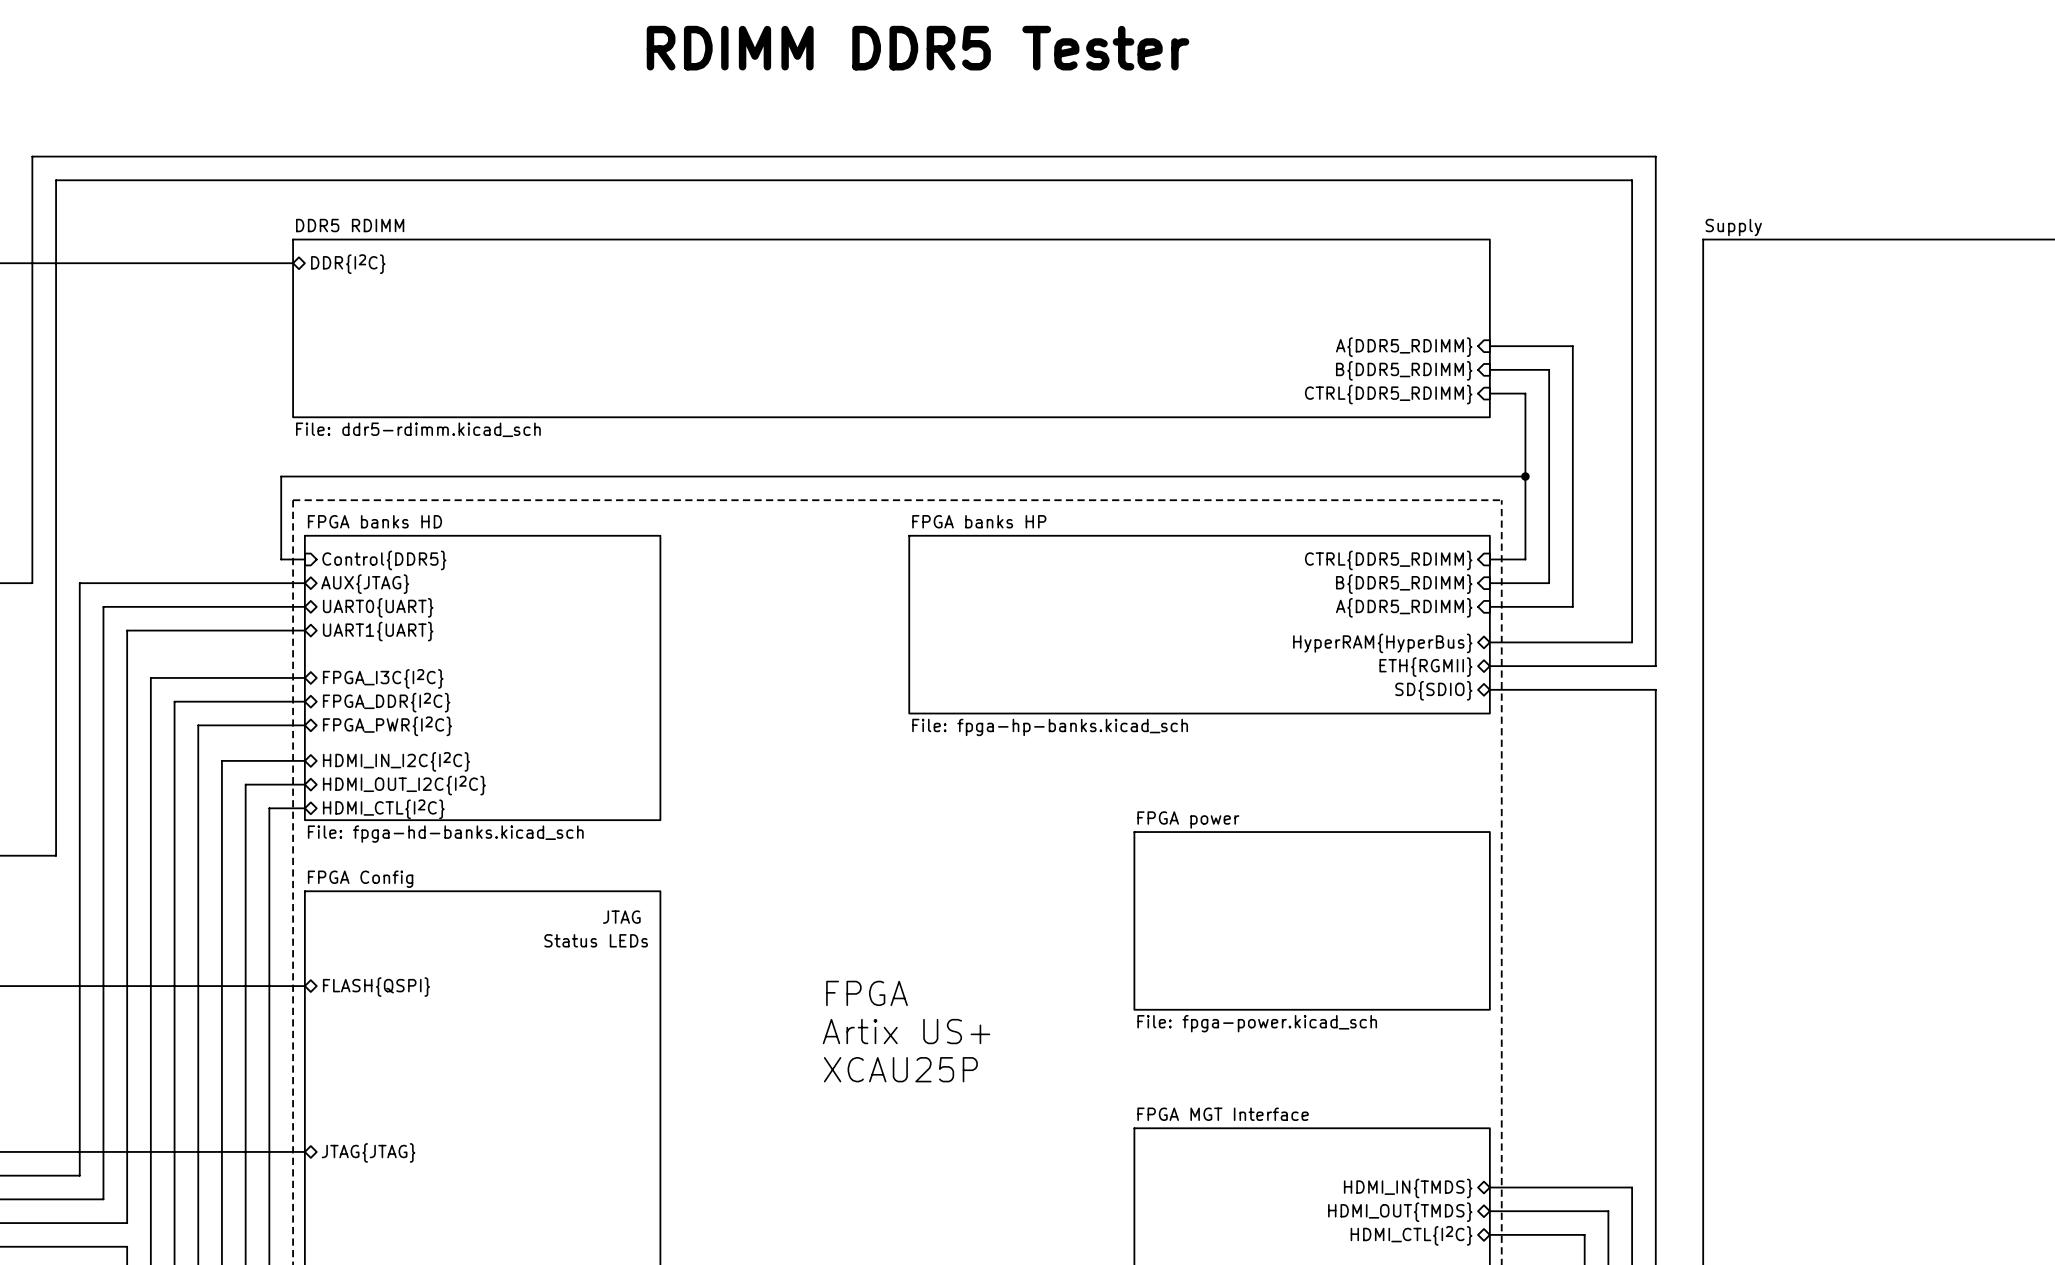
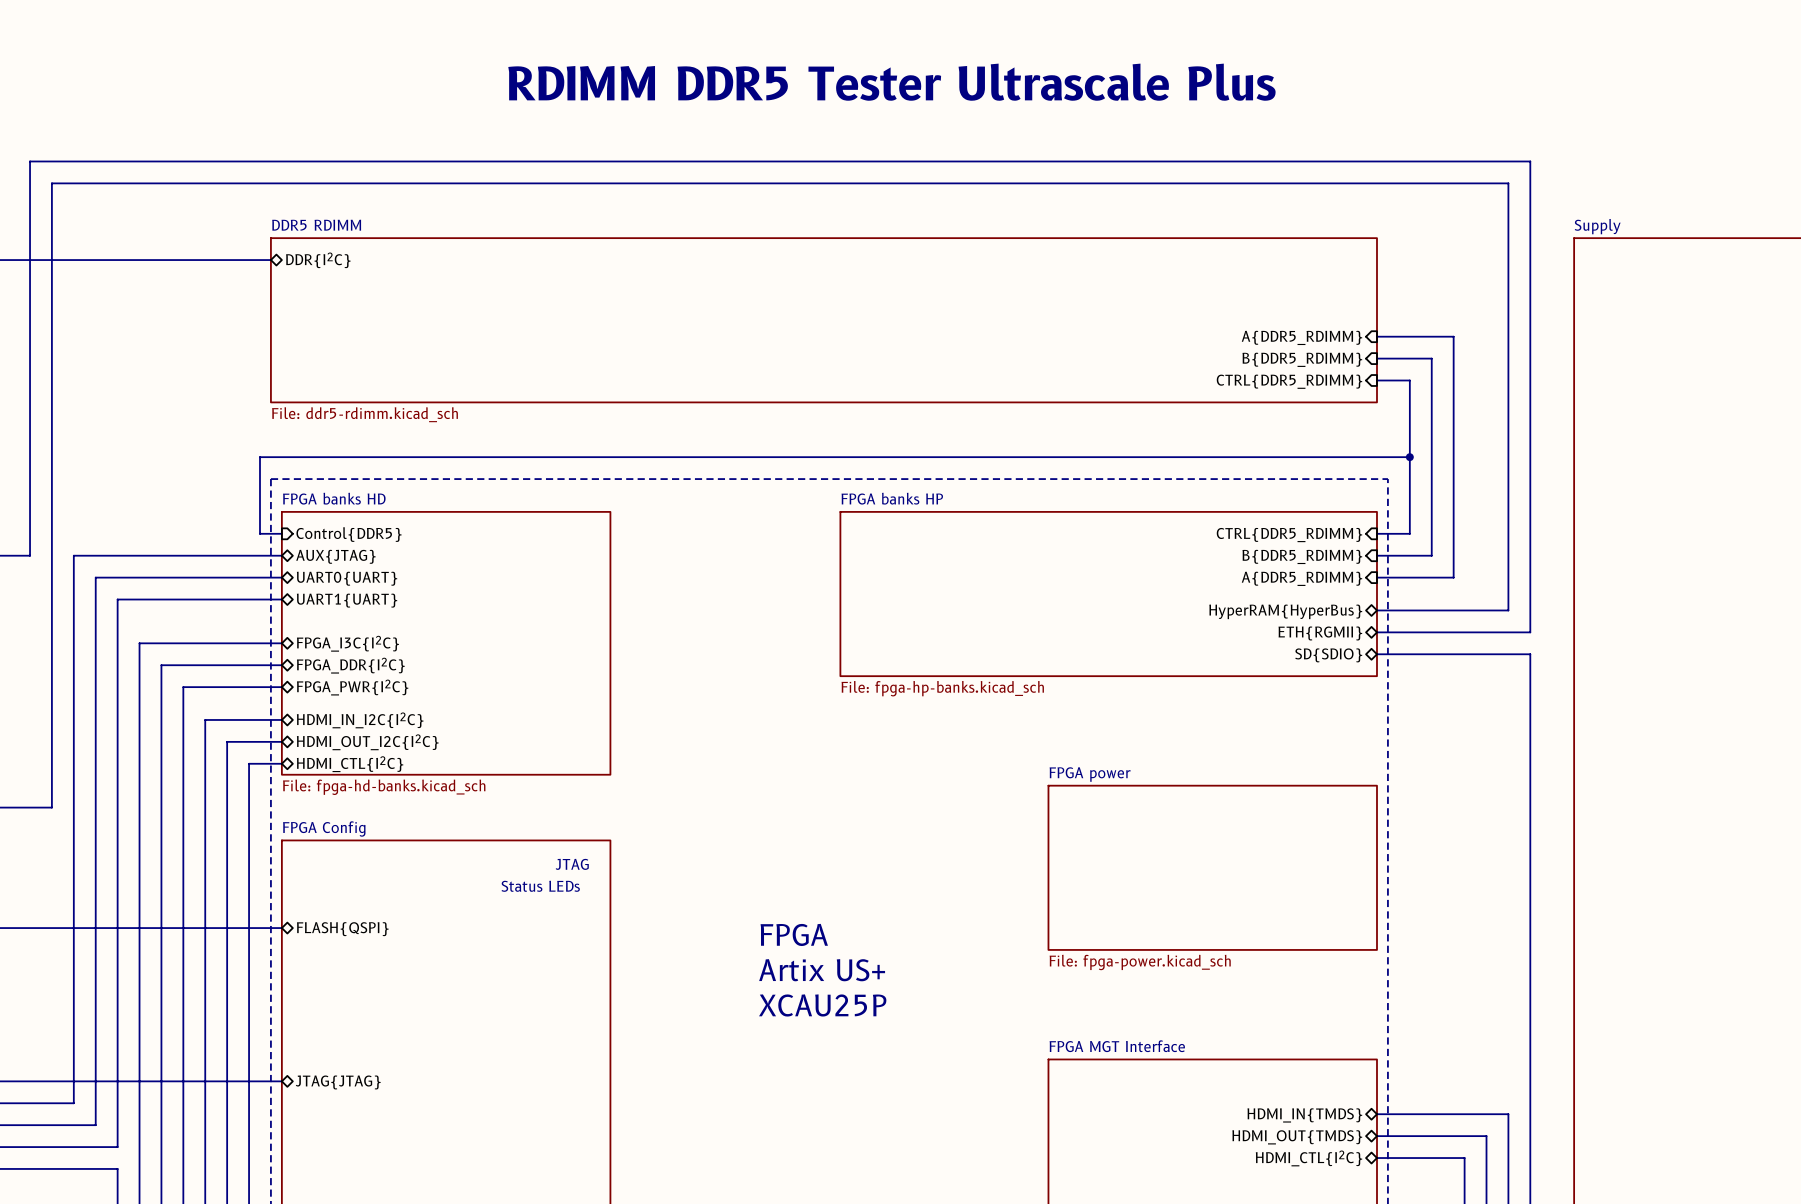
text: RDIMM DDR5 Tester (918, 48) -> RDIMM DDR5 Tester Ultrascale Plus (891, 82)

